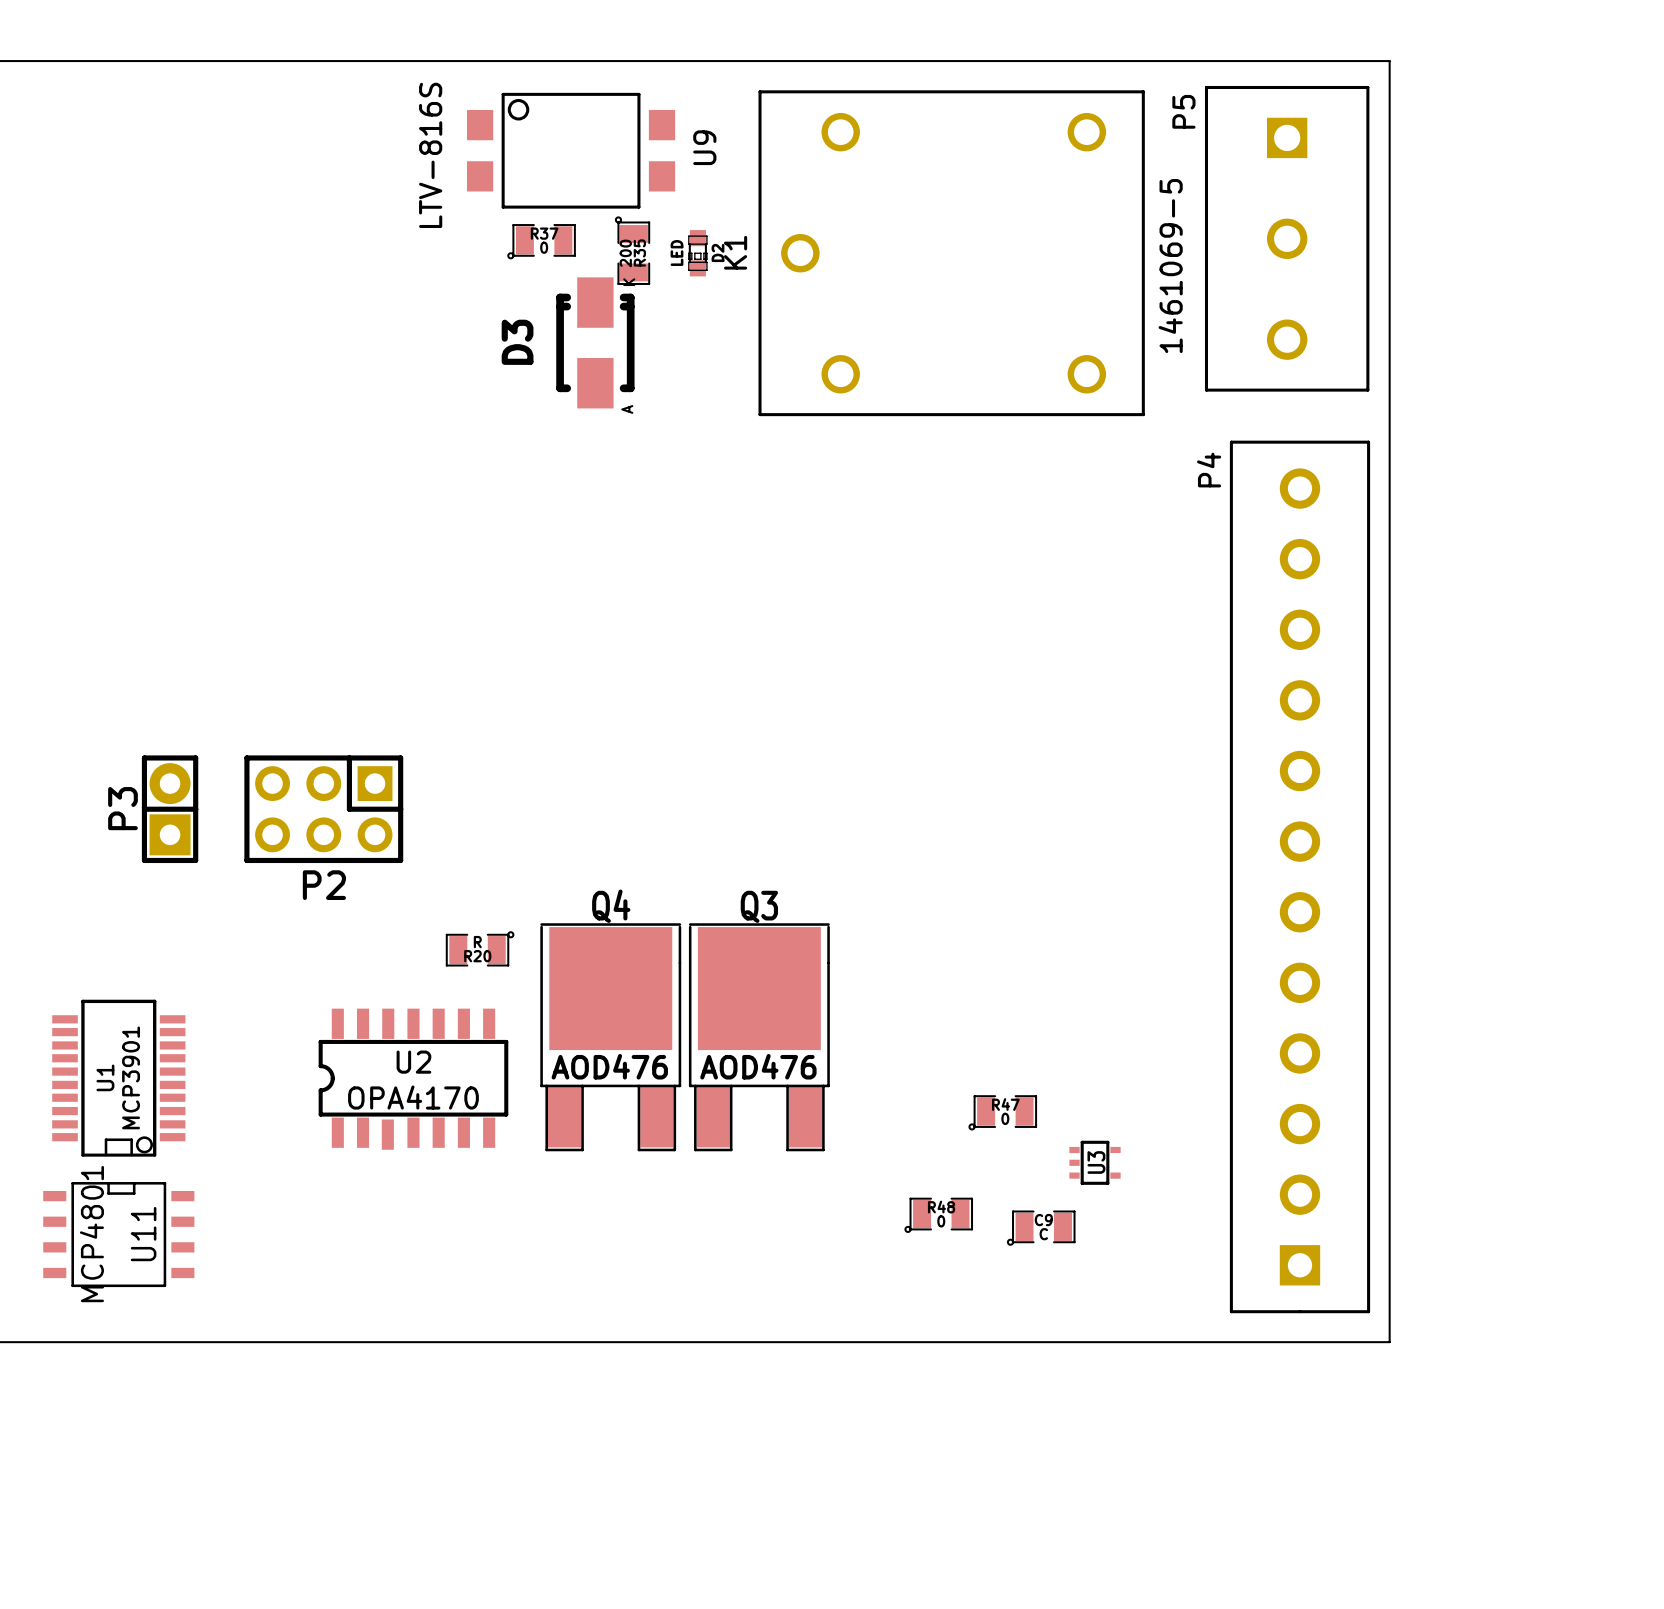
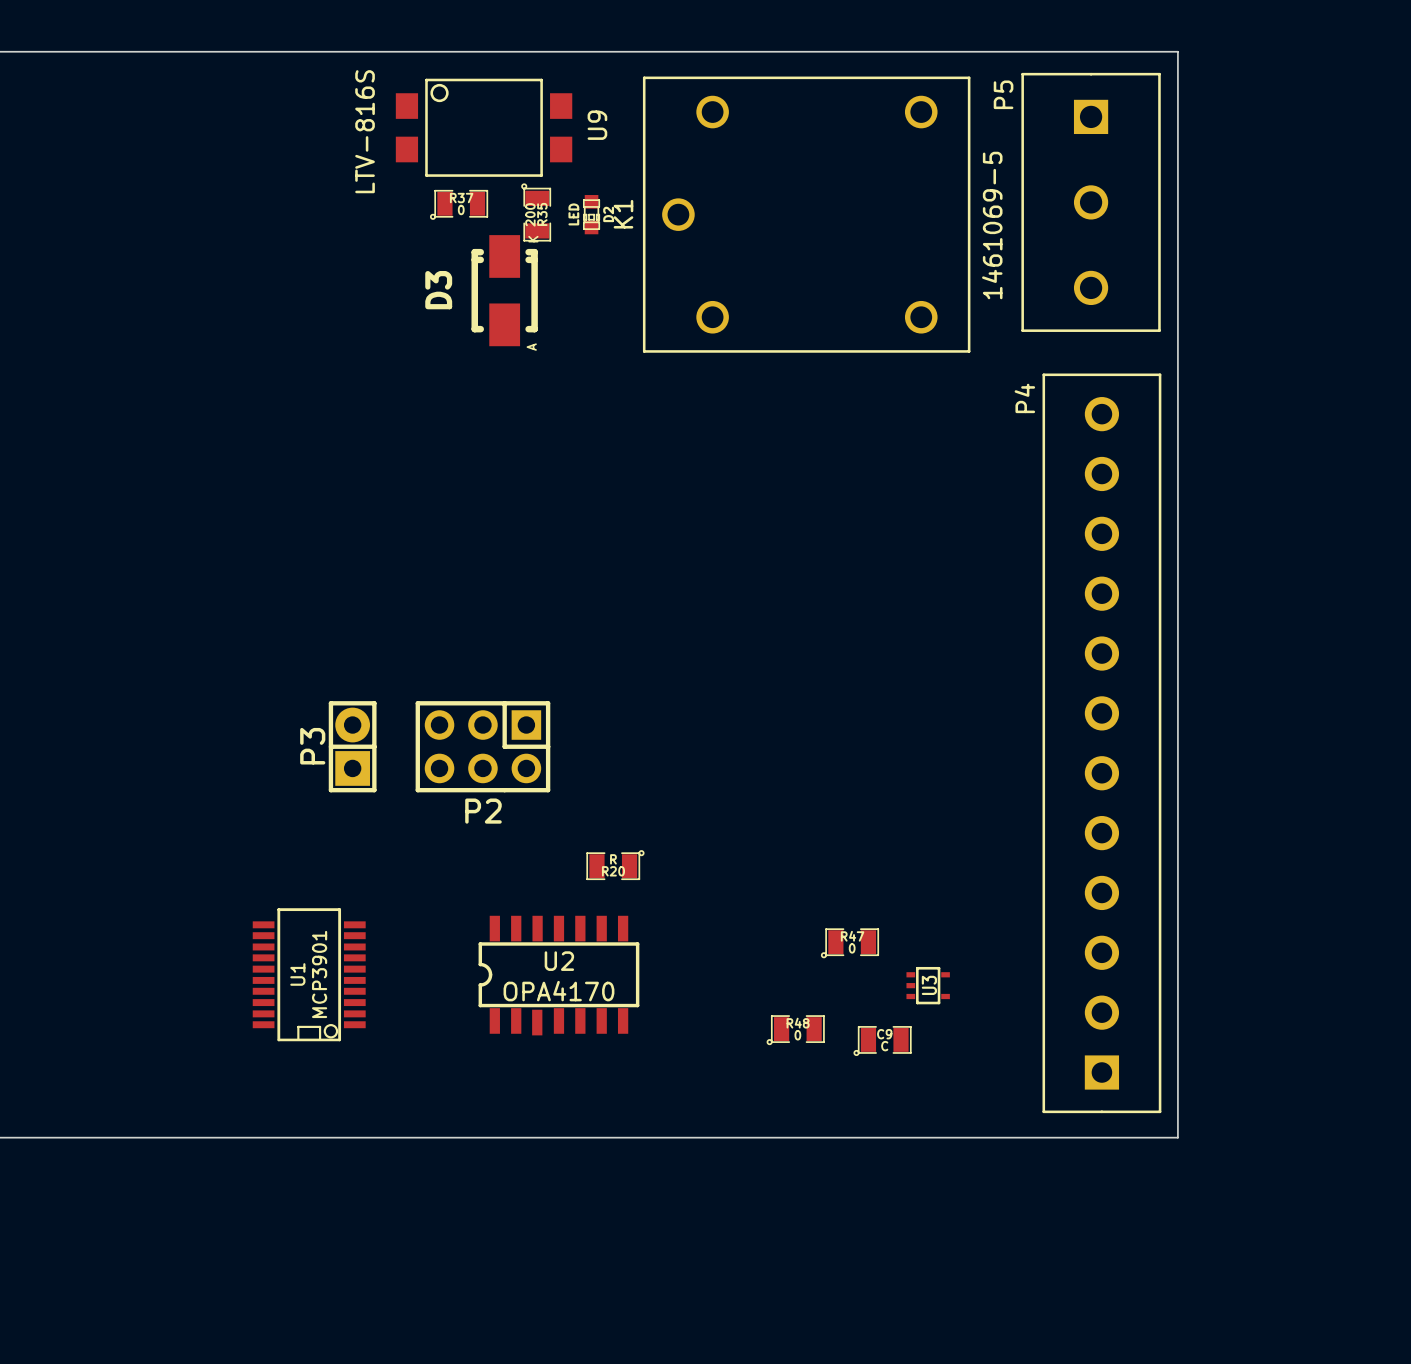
P3 position: (170, 809) -> (352, 746)
P2 position: (323, 809) -> (482, 746)
R20 position: (480, 948) -> (615, 865)
Q4: AOD476 (610, 1037) -> none
Q3: AOD476 (759, 1037) -> none
U1 position: (118, 1078) -> (309, 974)
U2 position: (413, 1079) -> (558, 975)
U11: MCP4801 (118, 1234) -> none

